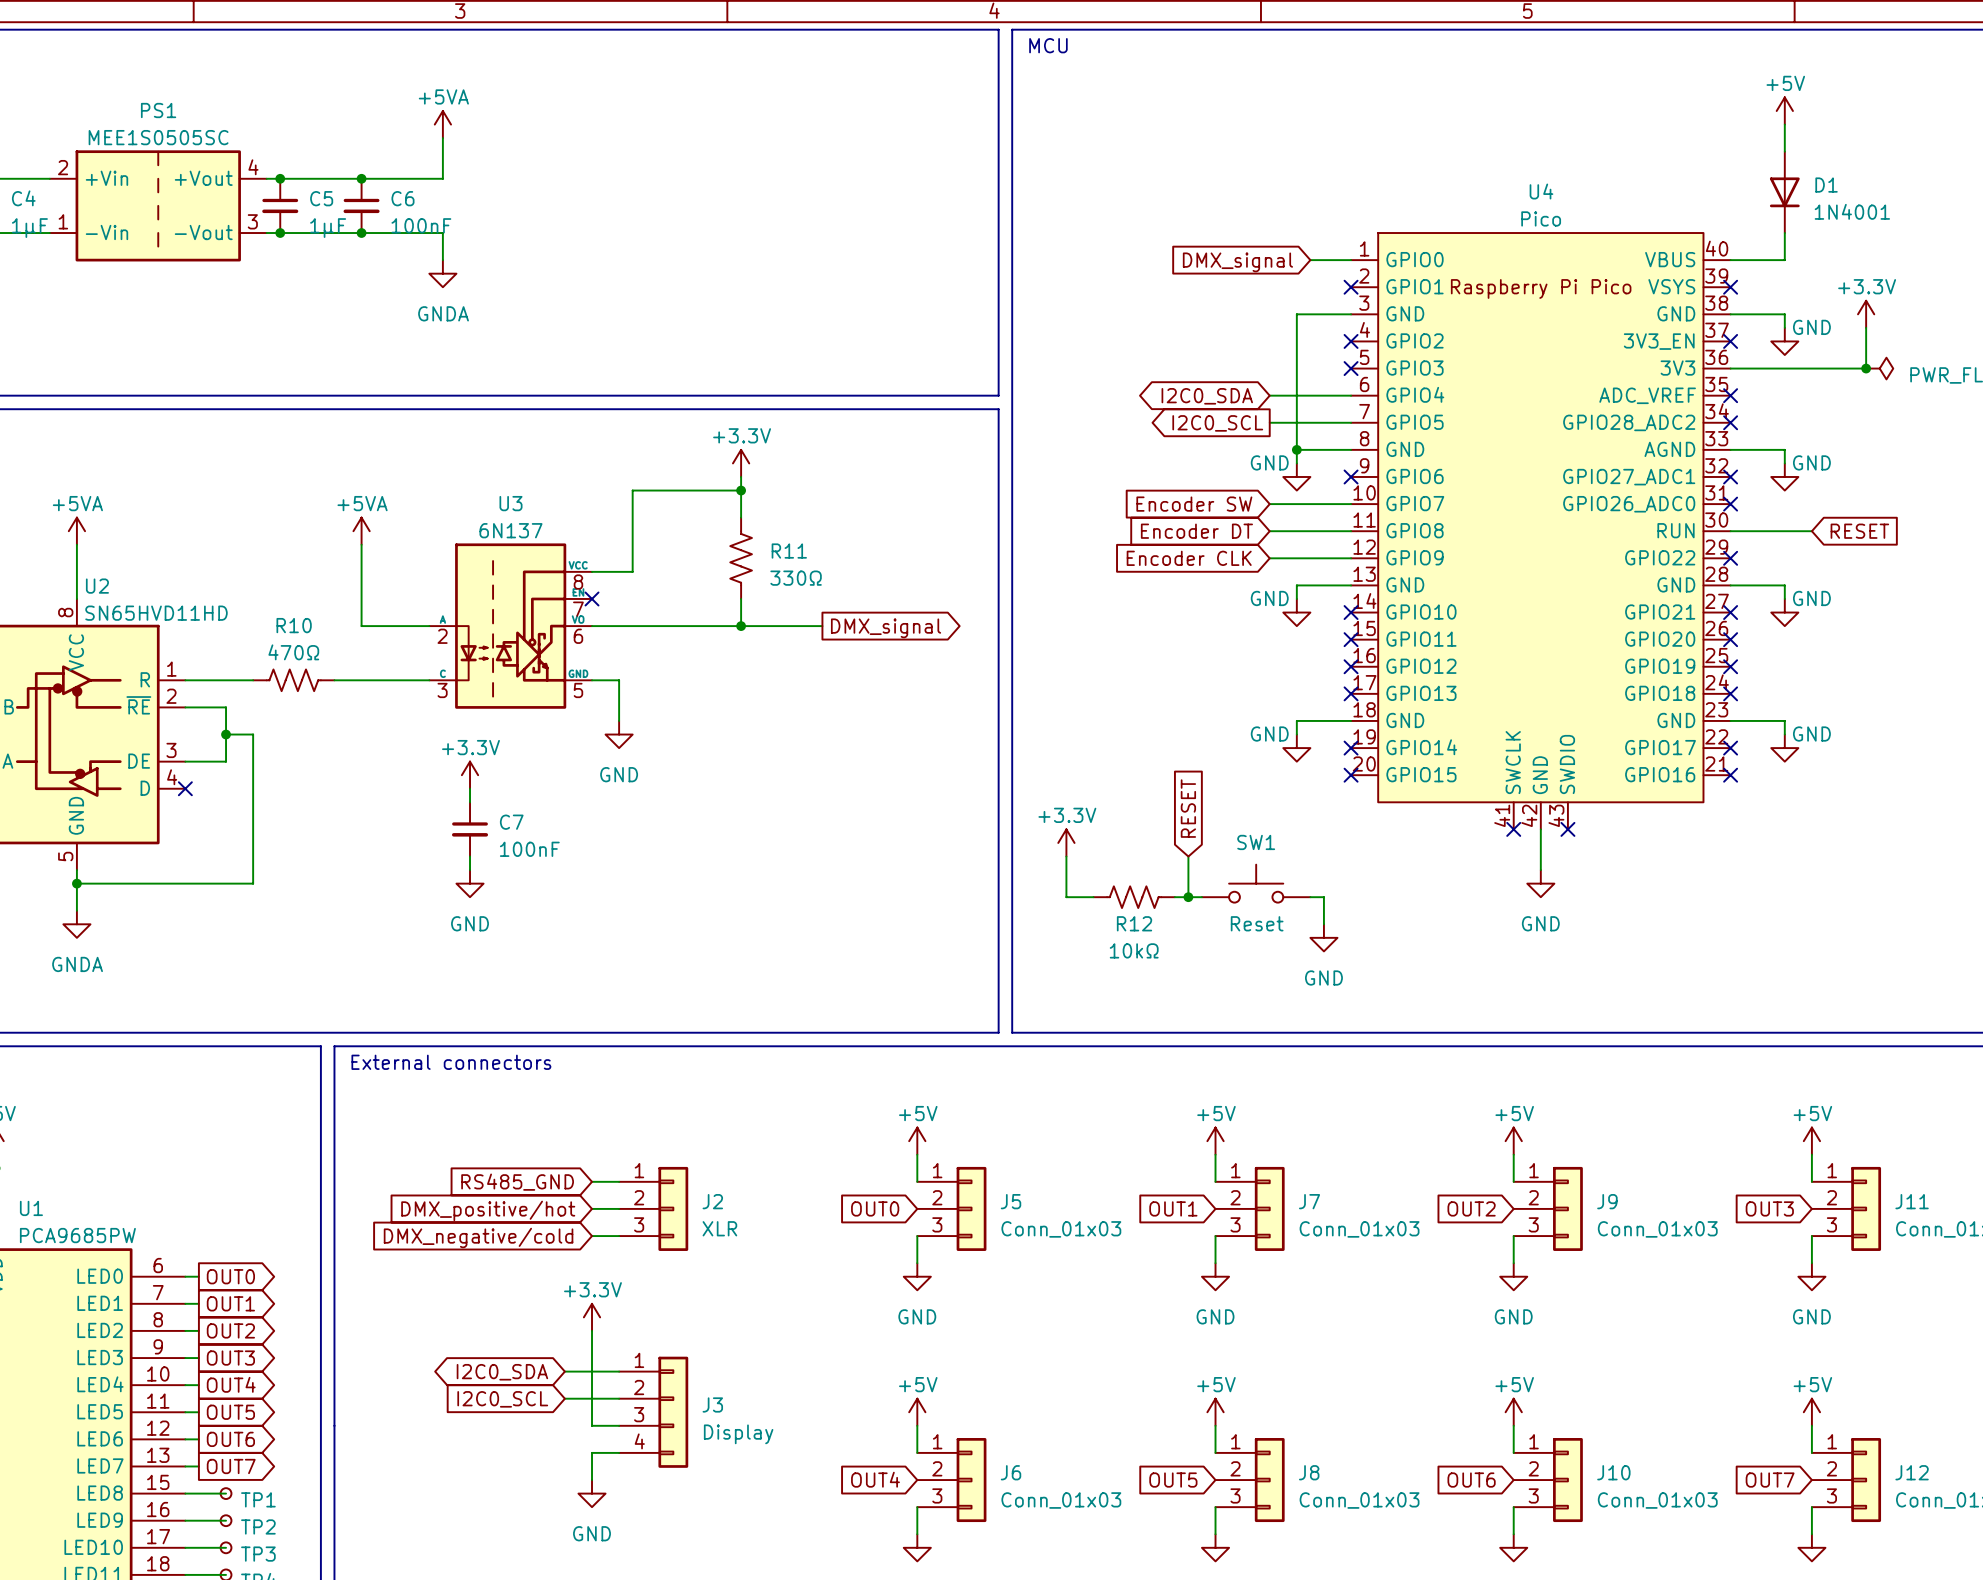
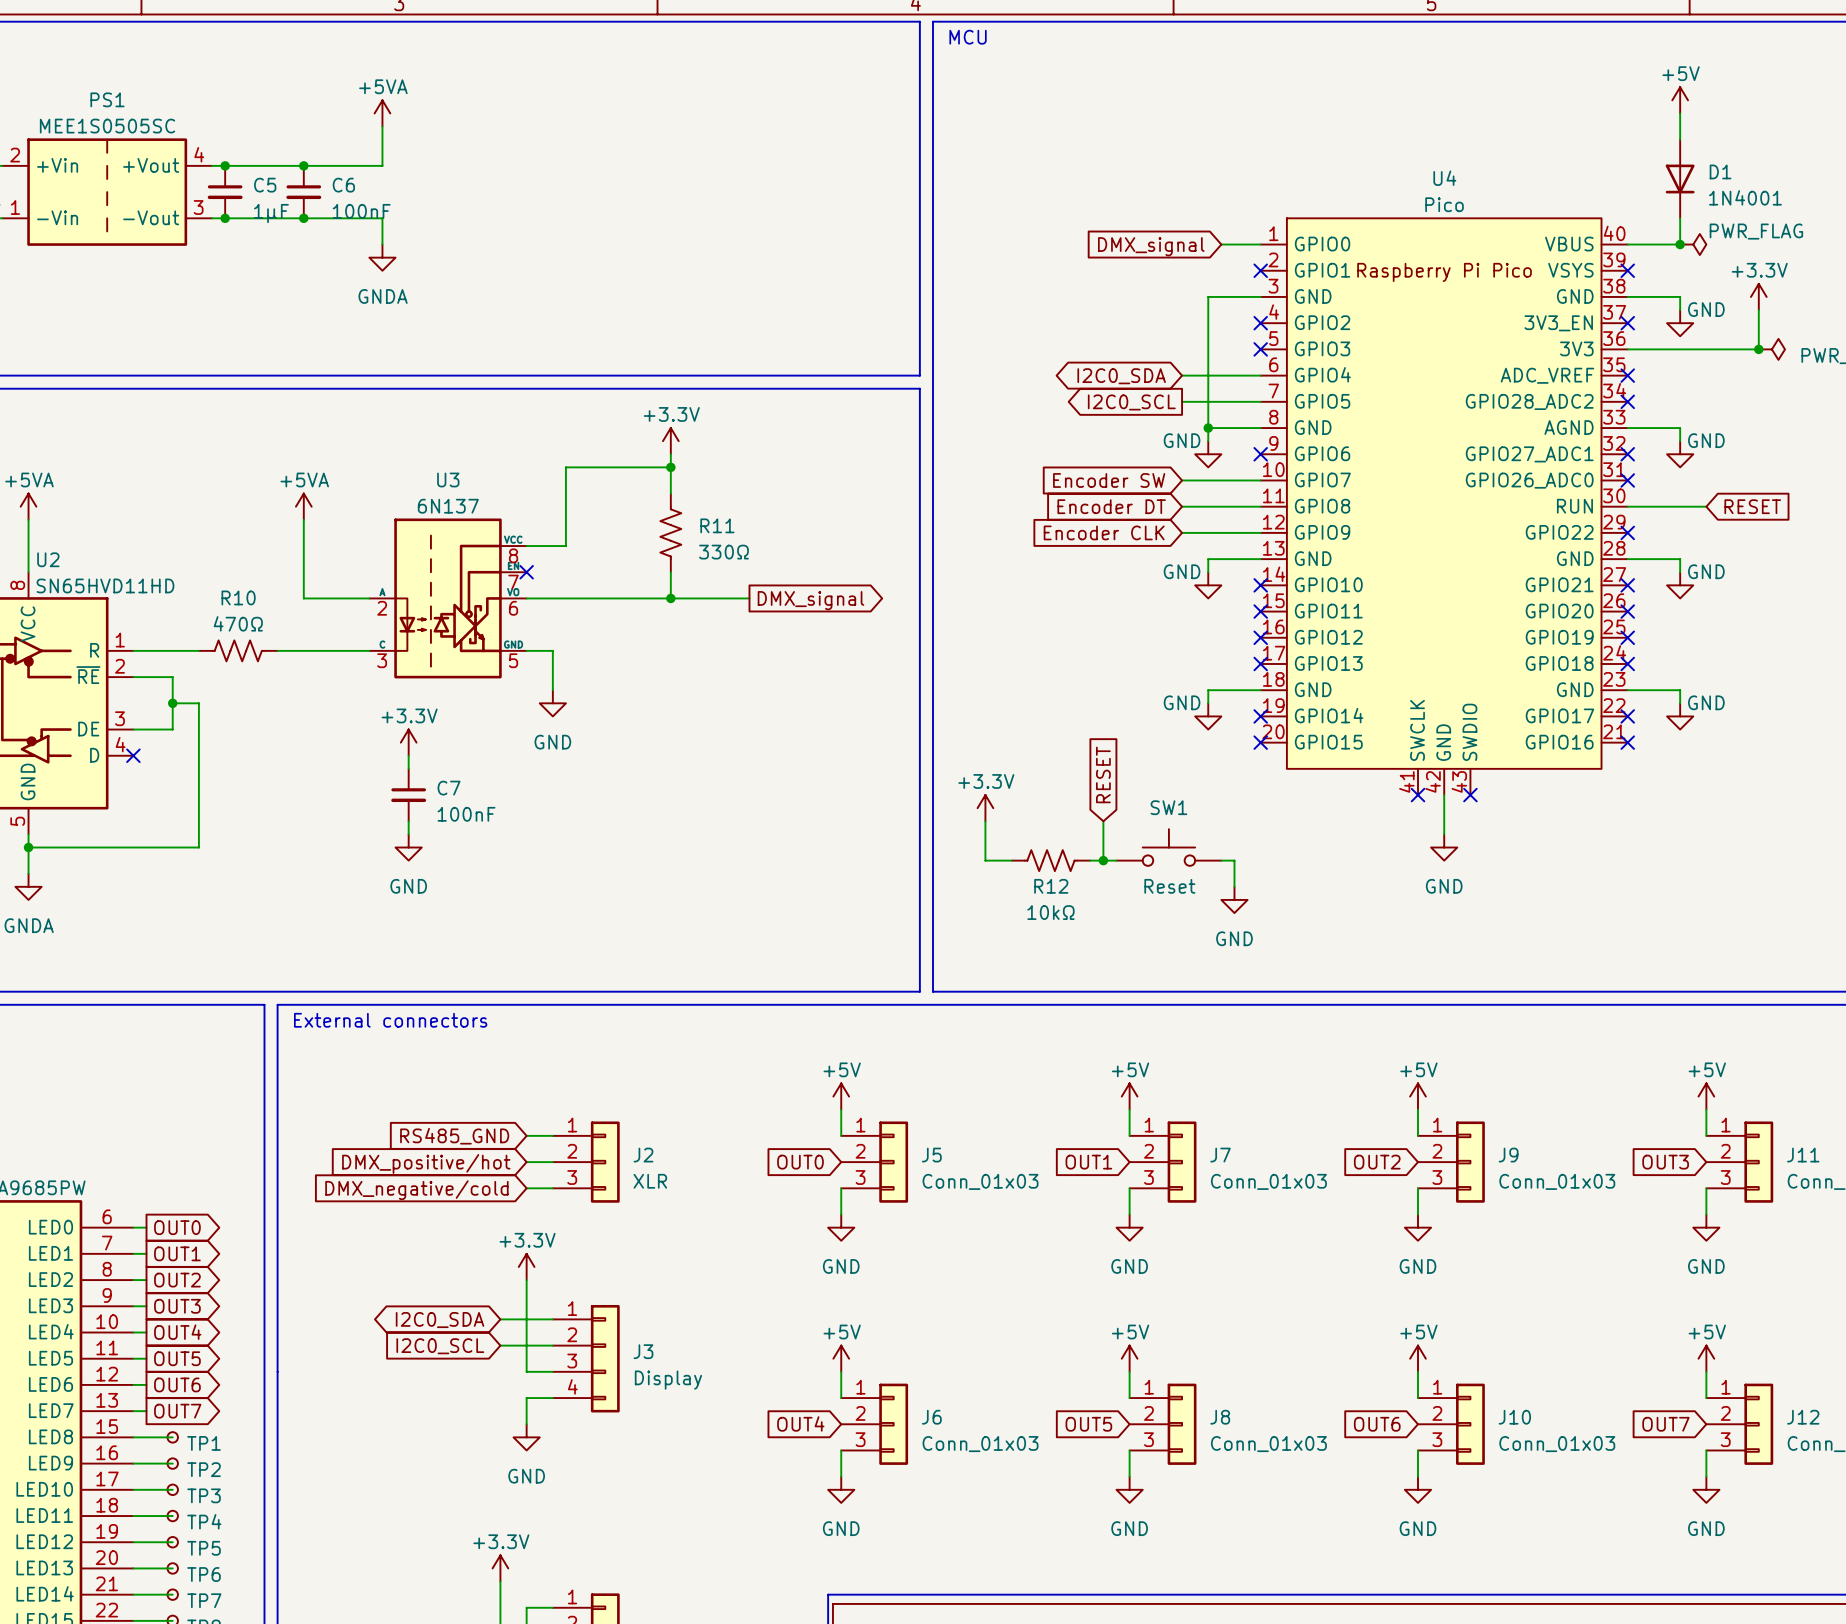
junction: none -> (1680, 244)
power symbol: none -> PWR_FLAG (1693, 244)

